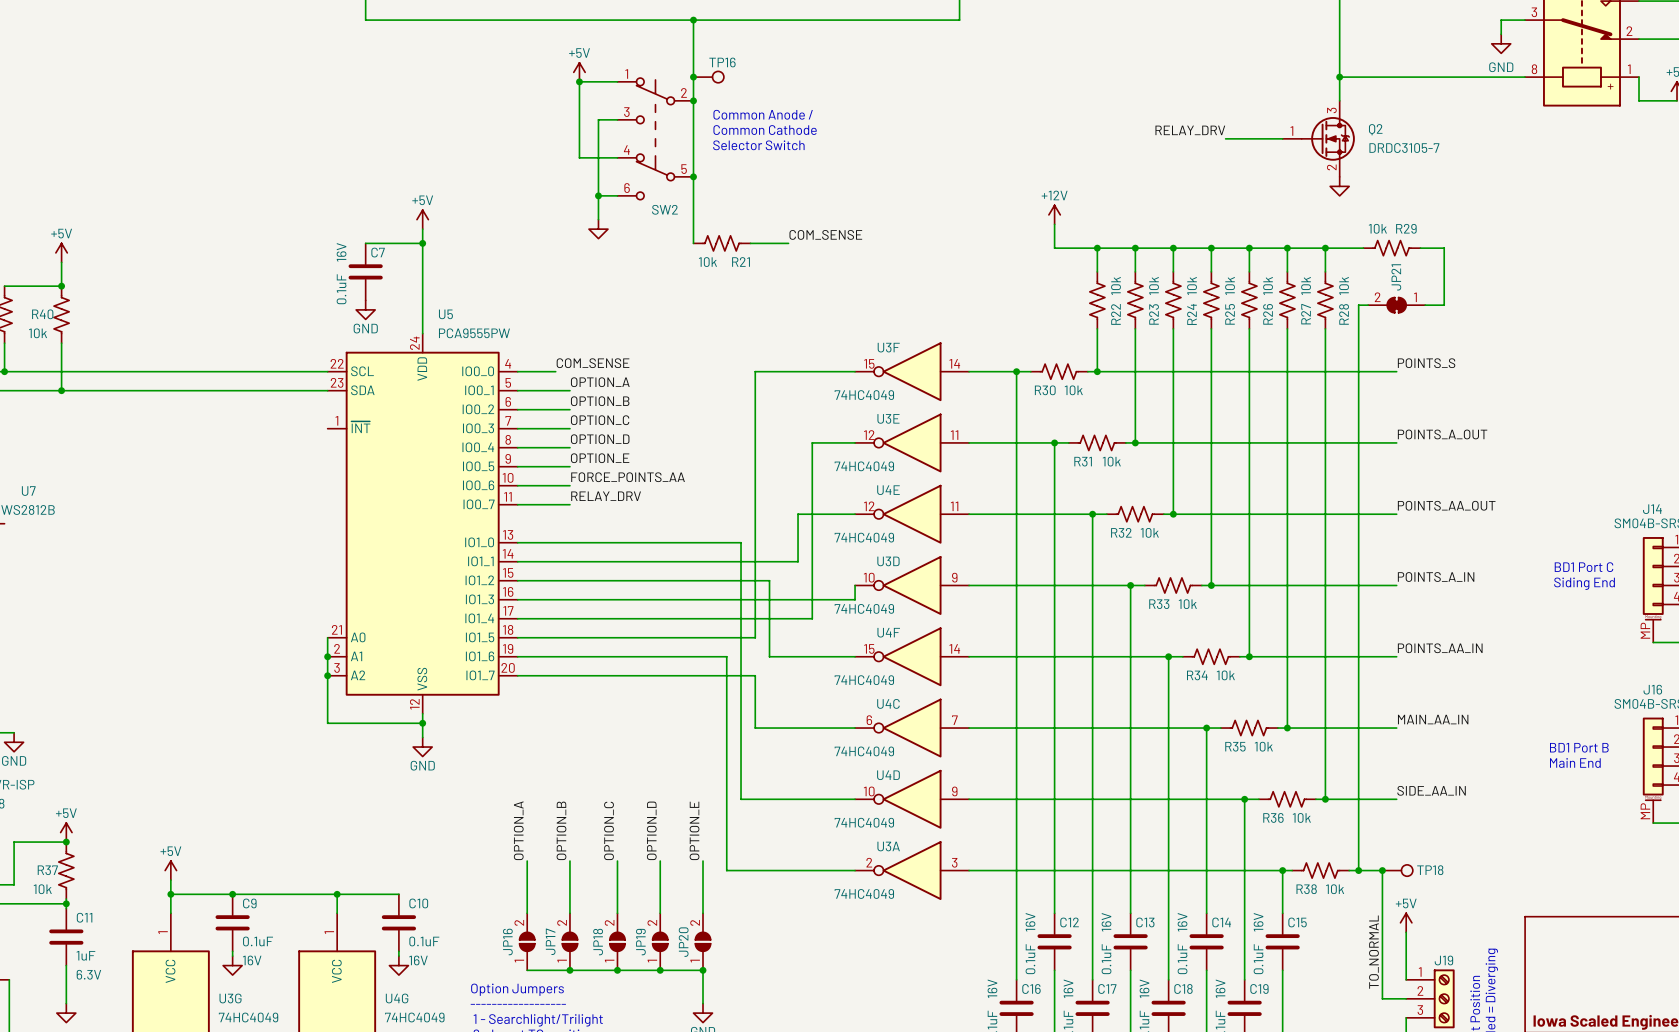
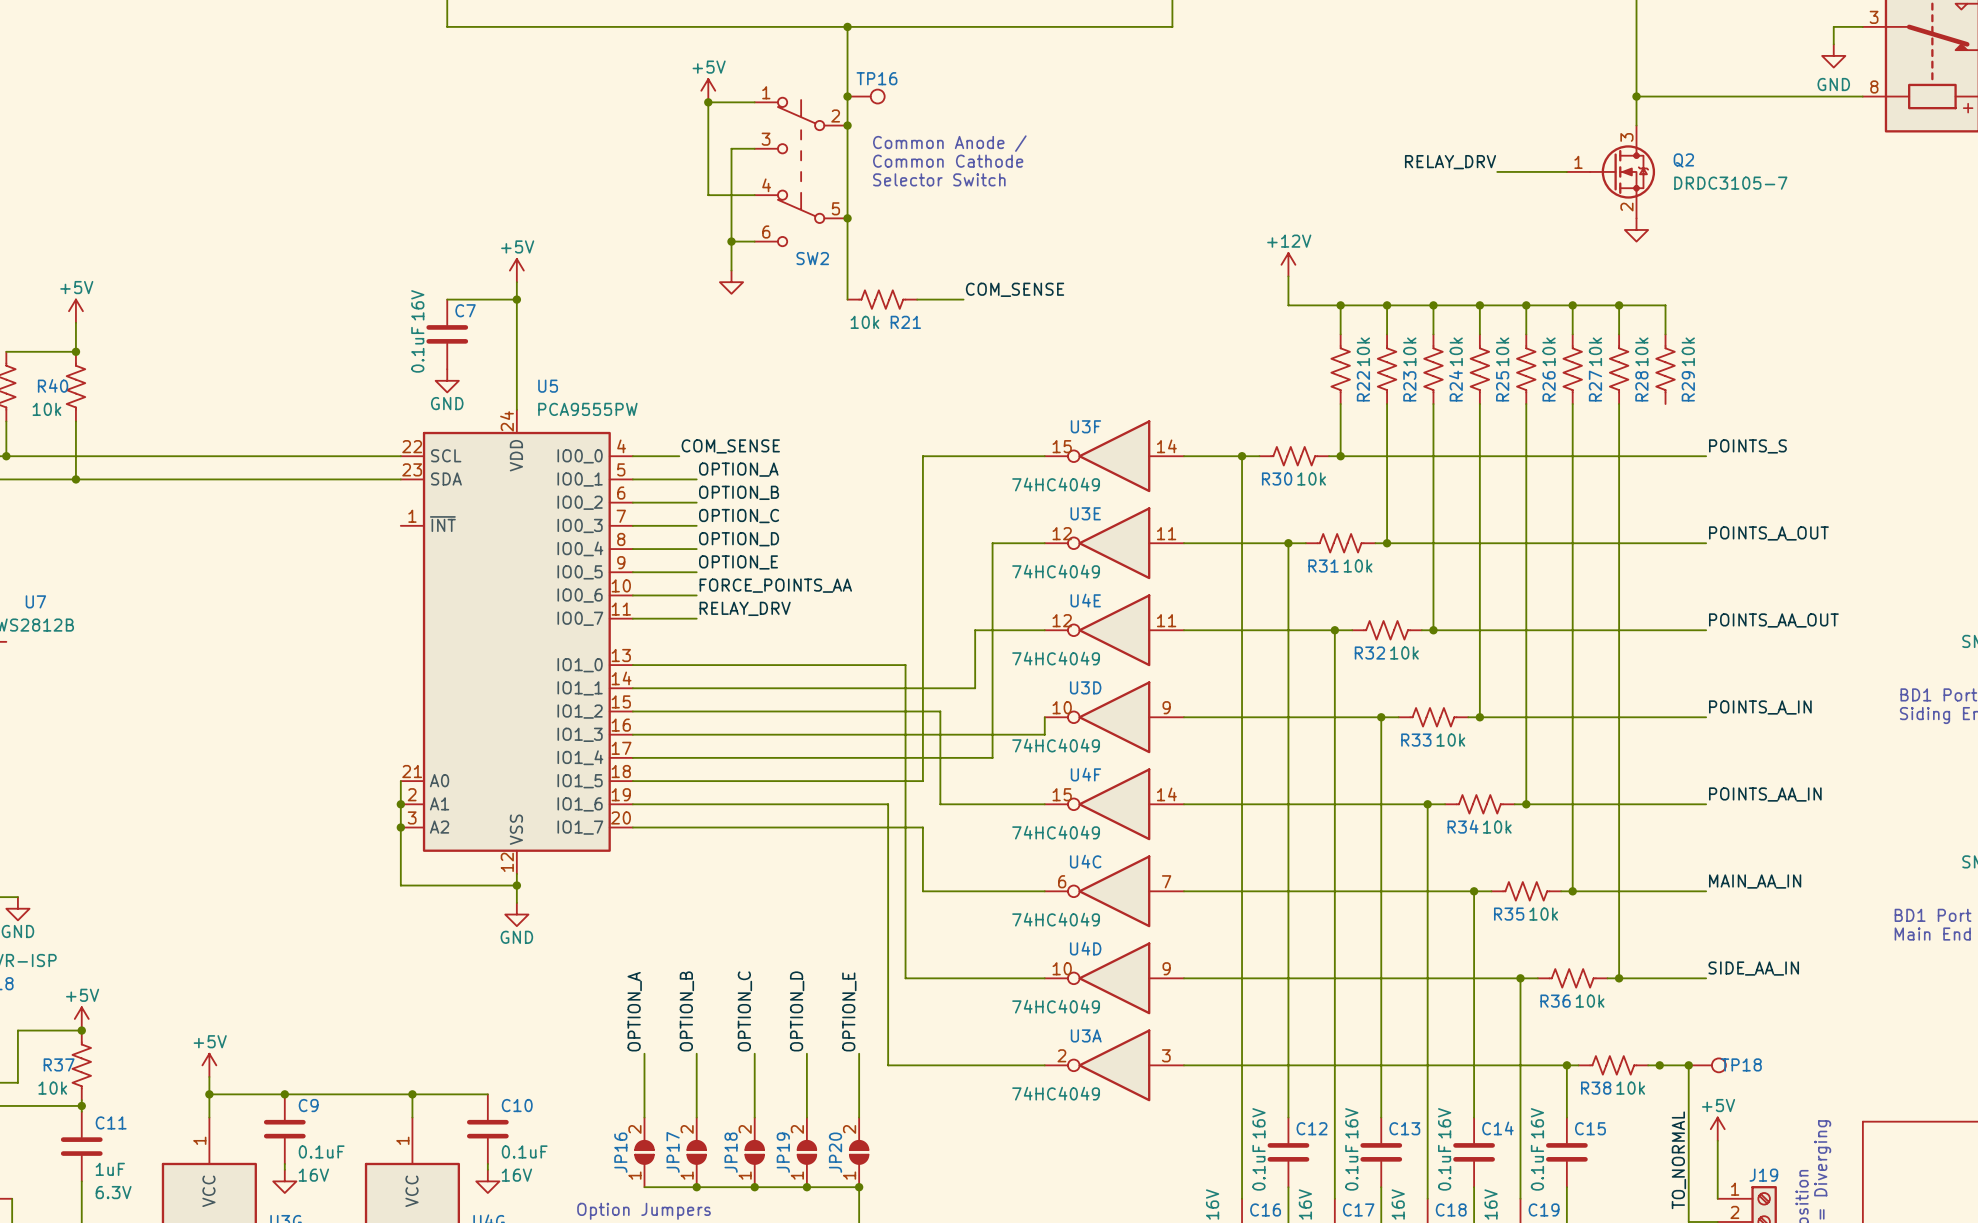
wire: none -> (1665, 305) (1665, 334)
R29 rotation: 0° (1391, 248) -> 90° clockwise (1665, 369)
R29 position: (1391, 248) -> (1665, 369)
wire: (1420, 248) (1444, 248) (1444, 305) (1425, 305) -> none
wire: (1368, 305) (1358, 305) (1358, 870) -> none
JP21: (1396, 305) -> none

